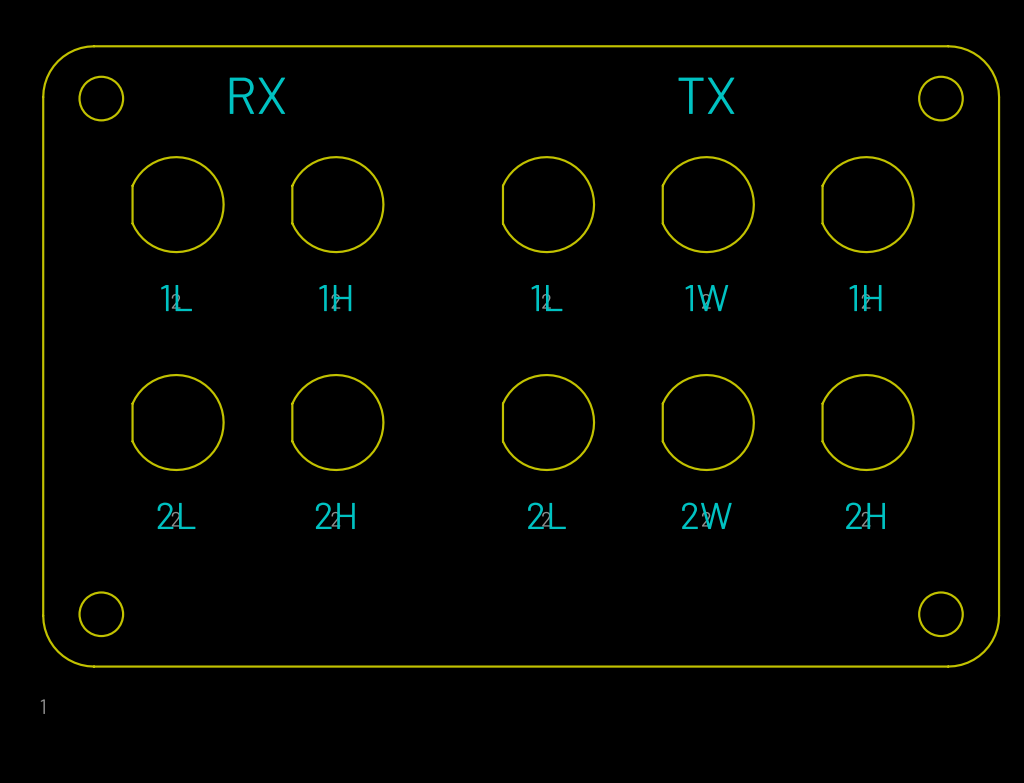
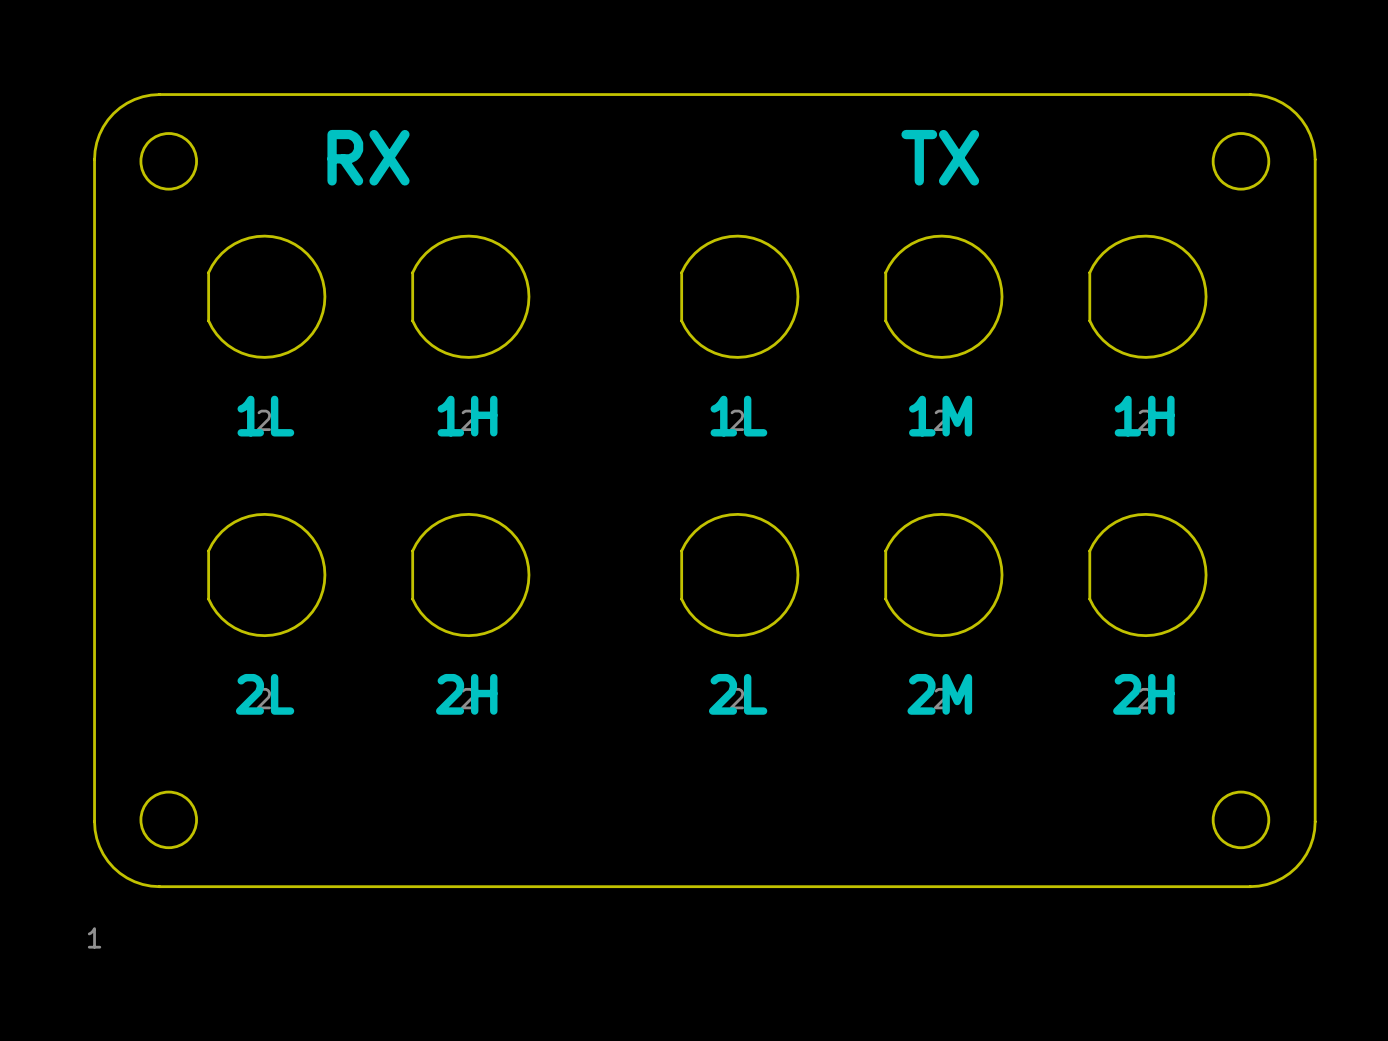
text: 1W (706, 298) -> 1M (940, 416)
text: 2W (706, 515) -> 2M (939, 694)

